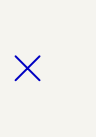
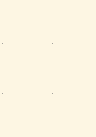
no-connect mark: (27, 68) -> none

